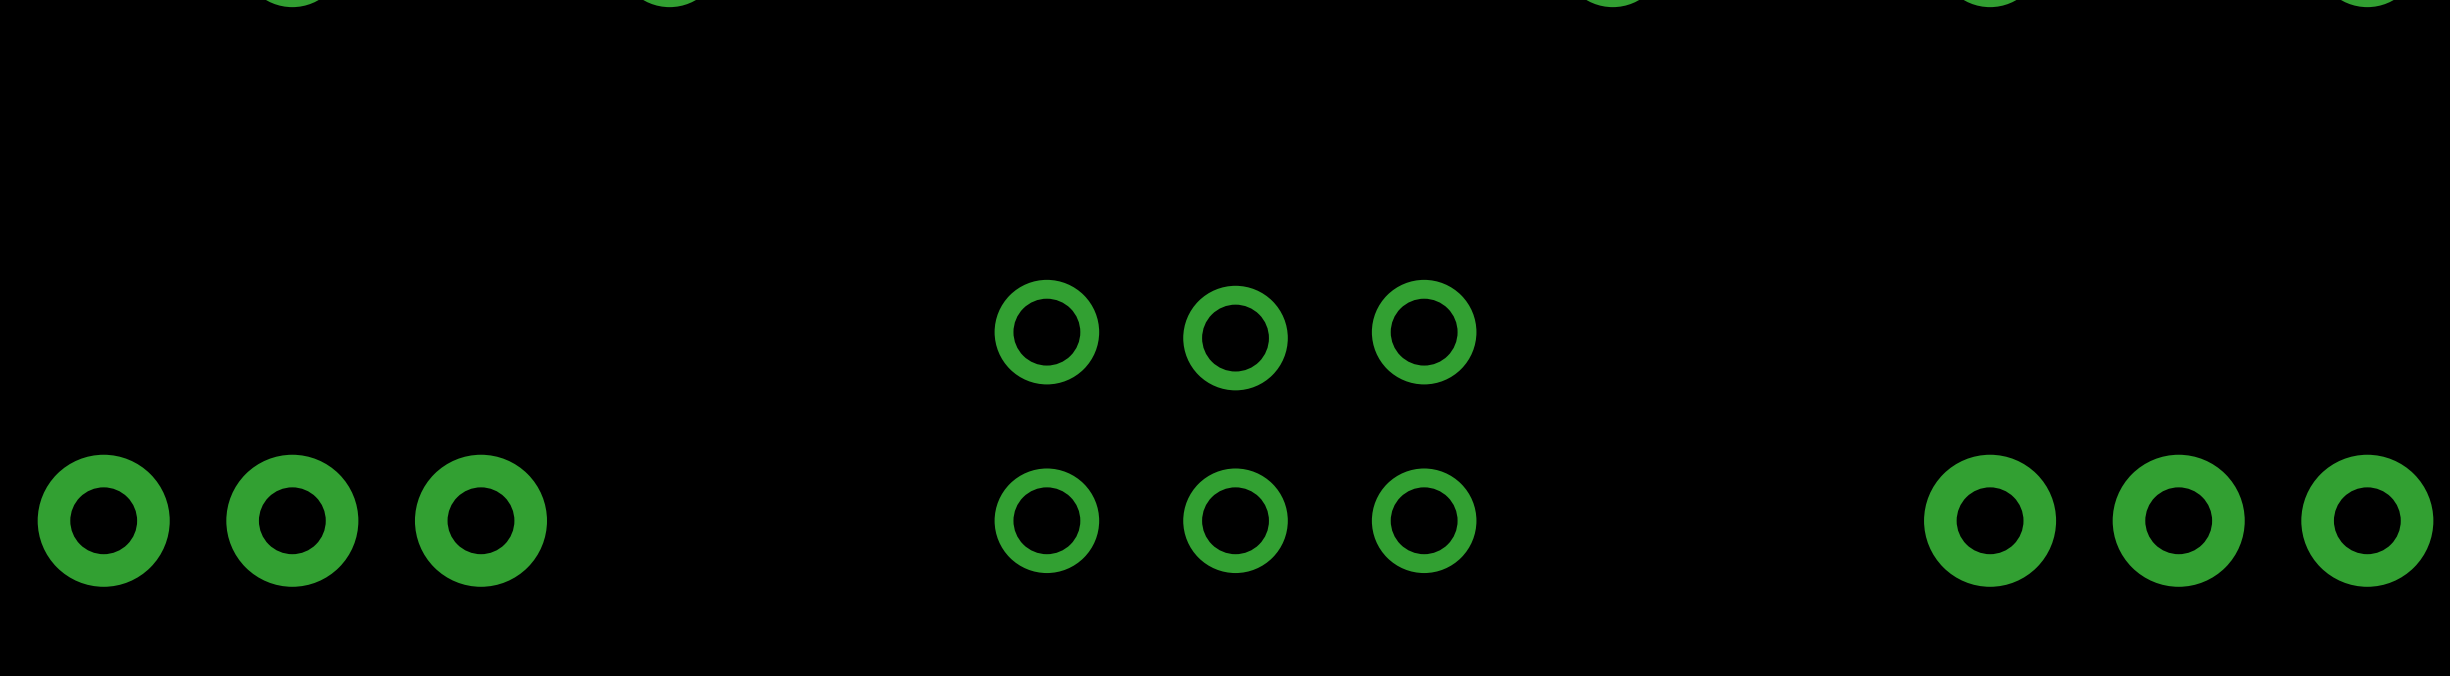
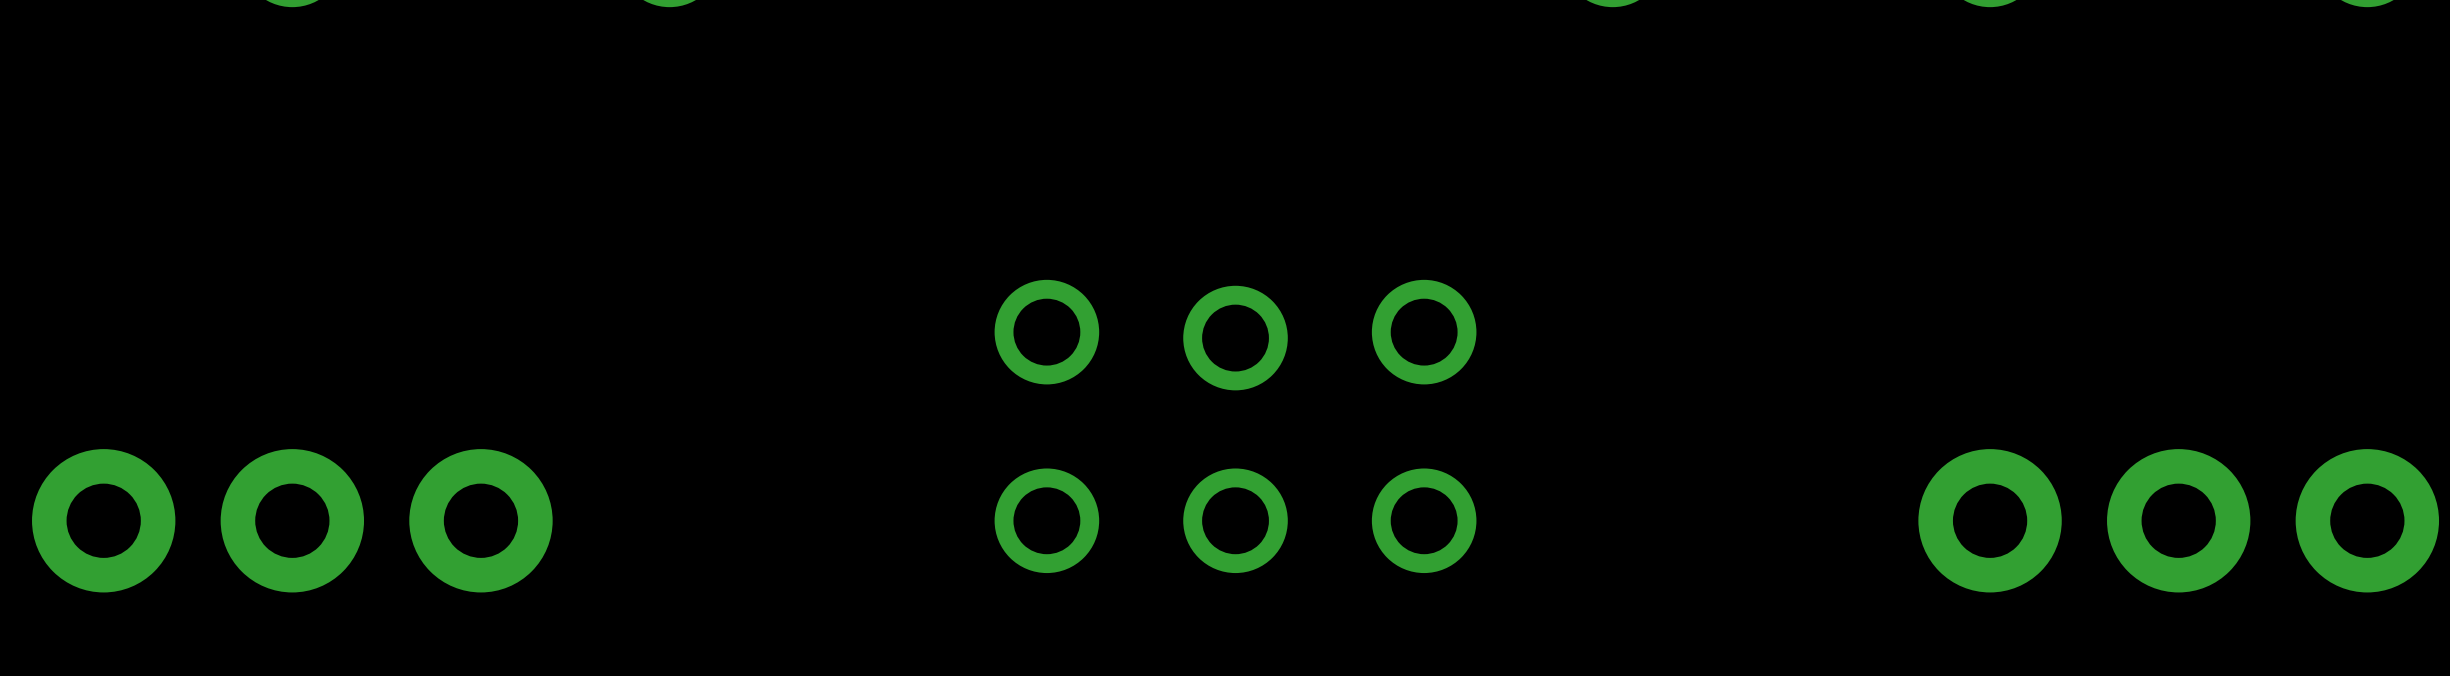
part footprint: [37, 454, 548, 587] -> [32, 449, 553, 593]
part footprint: [1924, 454, 2434, 587] -> [1918, 449, 2440, 593]

